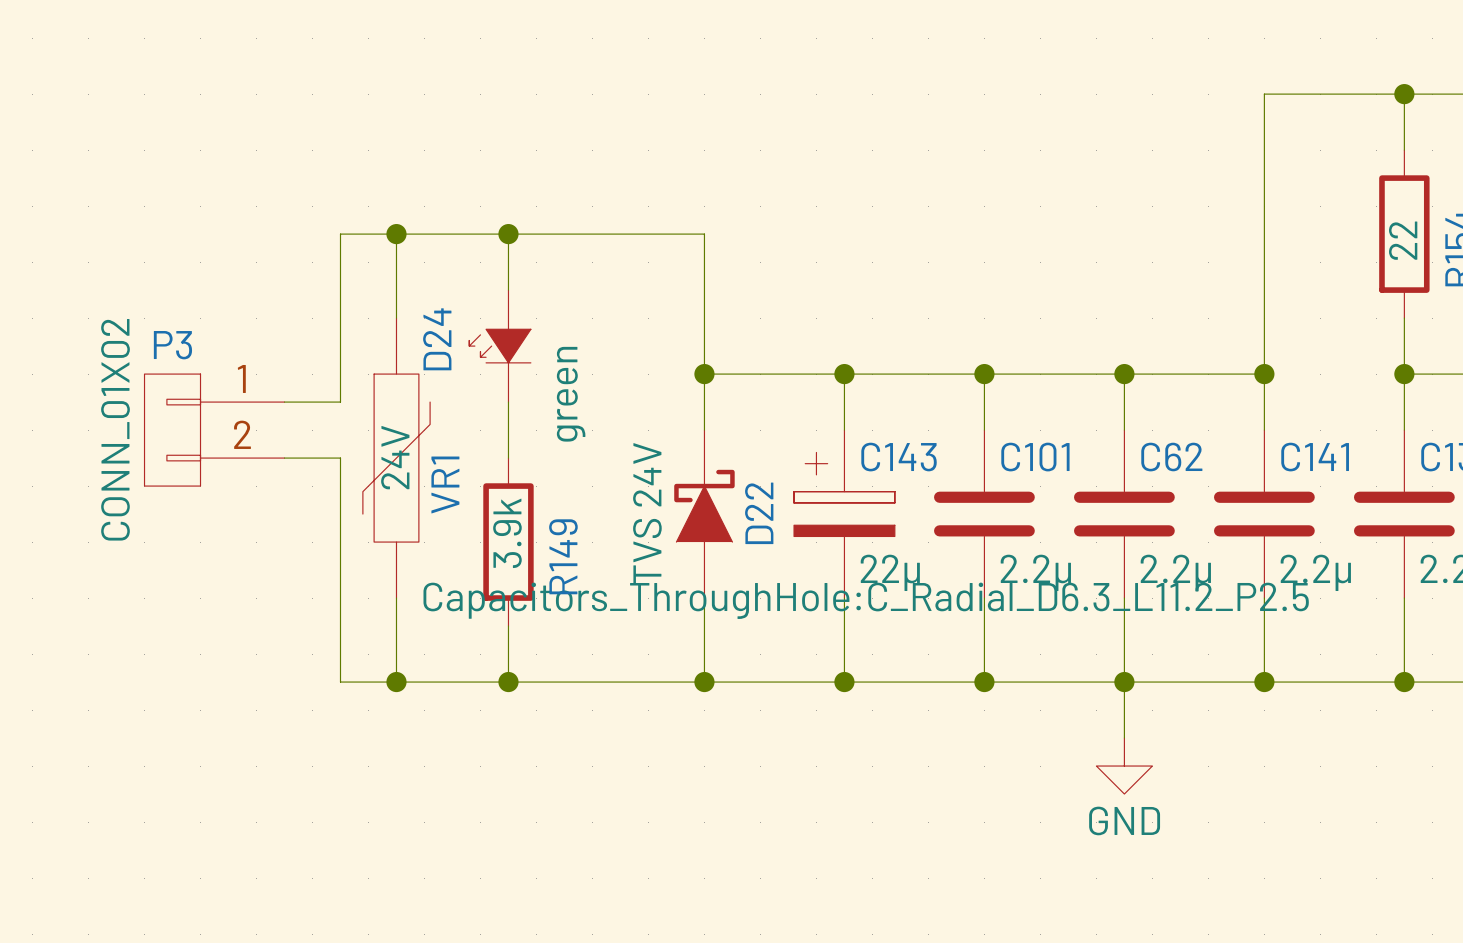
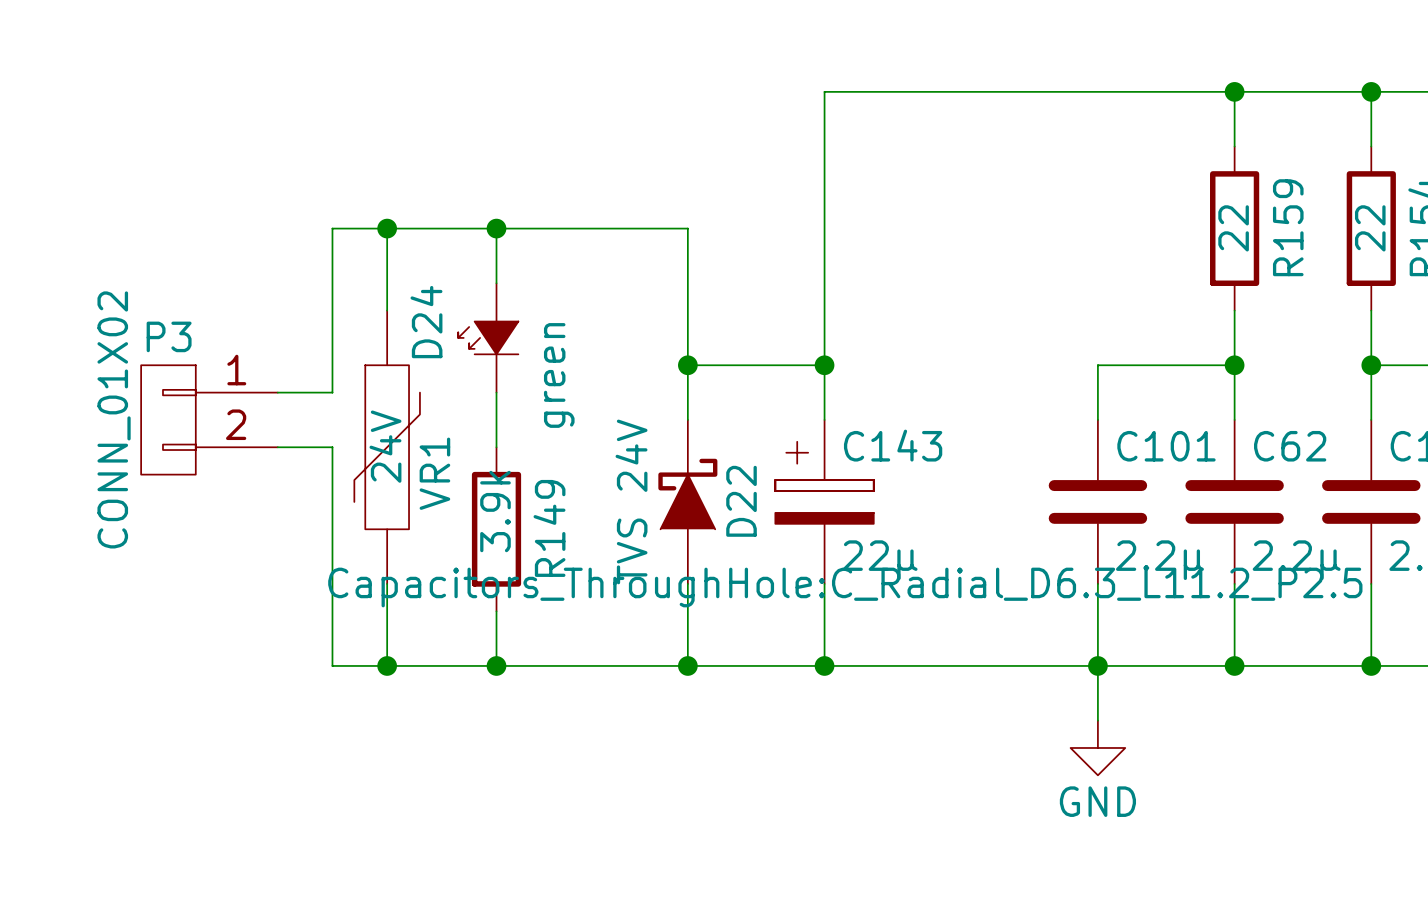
junction: none -> (1234, 91)
wire: (1264, 150) (1264, 318) -> none
R159: none -> 22 (1234, 228)
wire: (844, 374) (1124, 374) -> (824, 365) (824, 91) (1234, 91)
wire: (984, 374) (984, 430) -> none
junction: (984, 374) -> none
junction: (1124, 374) -> none
C62 name: C62 (1171, 457) -> C101 (1166, 446)
C141 name: C141 (1315, 457) -> C62 (1290, 446)
C101: 2.2µ (984, 514) -> none
wire: (984, 598) (984, 682) -> none
junction: (984, 682) -> none

